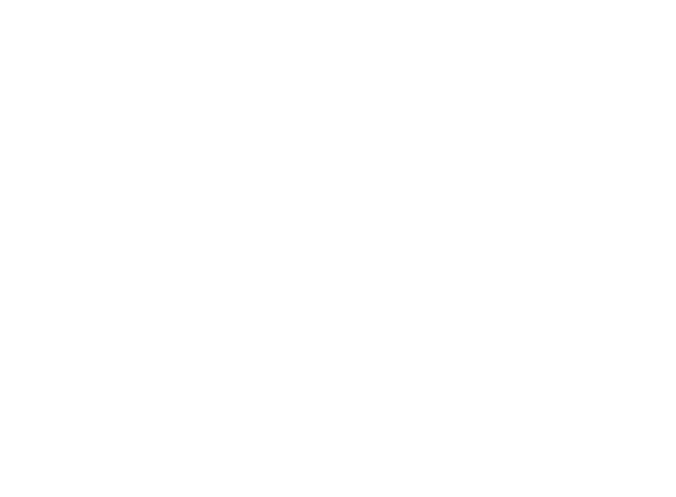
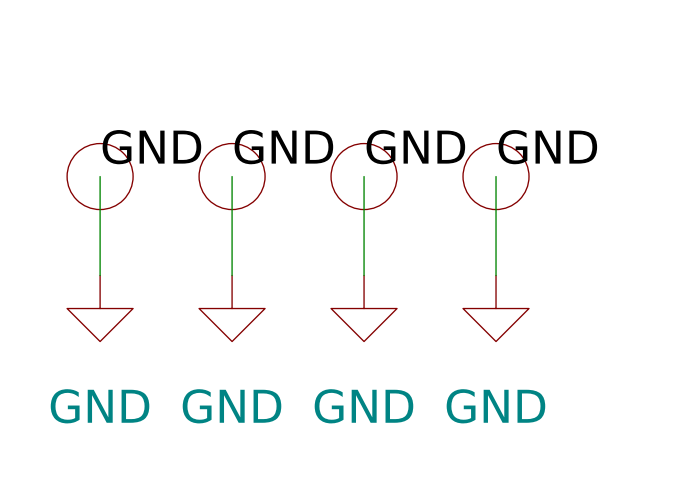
label: none -> GND (151, 147)
label: none -> GND (283, 147)
label: none -> GND (415, 147)
label: none -> GND (547, 147)
wire: none -> (100, 176) (100, 275)
part: none -> (100, 176)
wire: none -> (232, 176) (232, 275)
part: none -> (232, 176)
wire: none -> (364, 176) (364, 275)
part: none -> (364, 176)
wire: none -> (496, 176) (496, 275)
part: none -> (496, 176)
power symbol: none -> GND (100, 308)
power symbol: none -> GND (232, 308)
power symbol: none -> GND (364, 308)
power symbol: none -> GND (496, 308)

